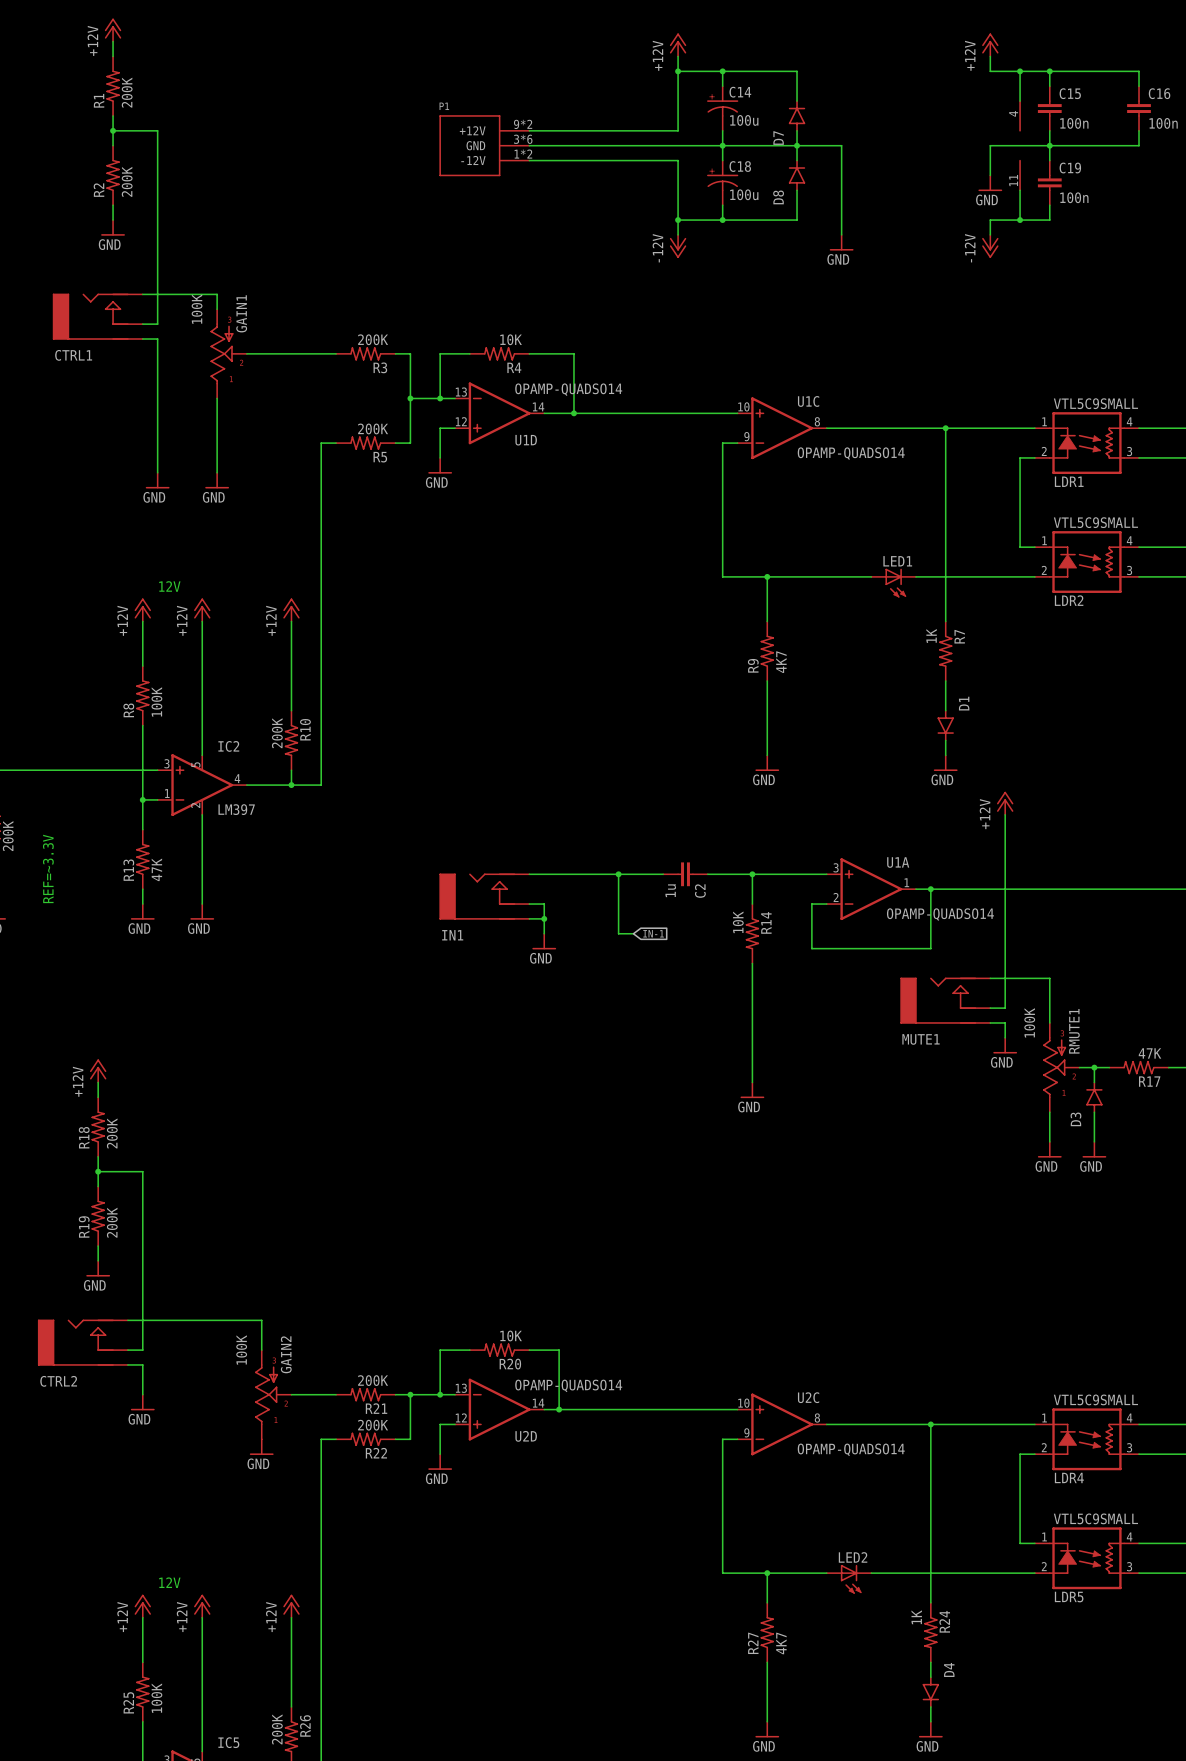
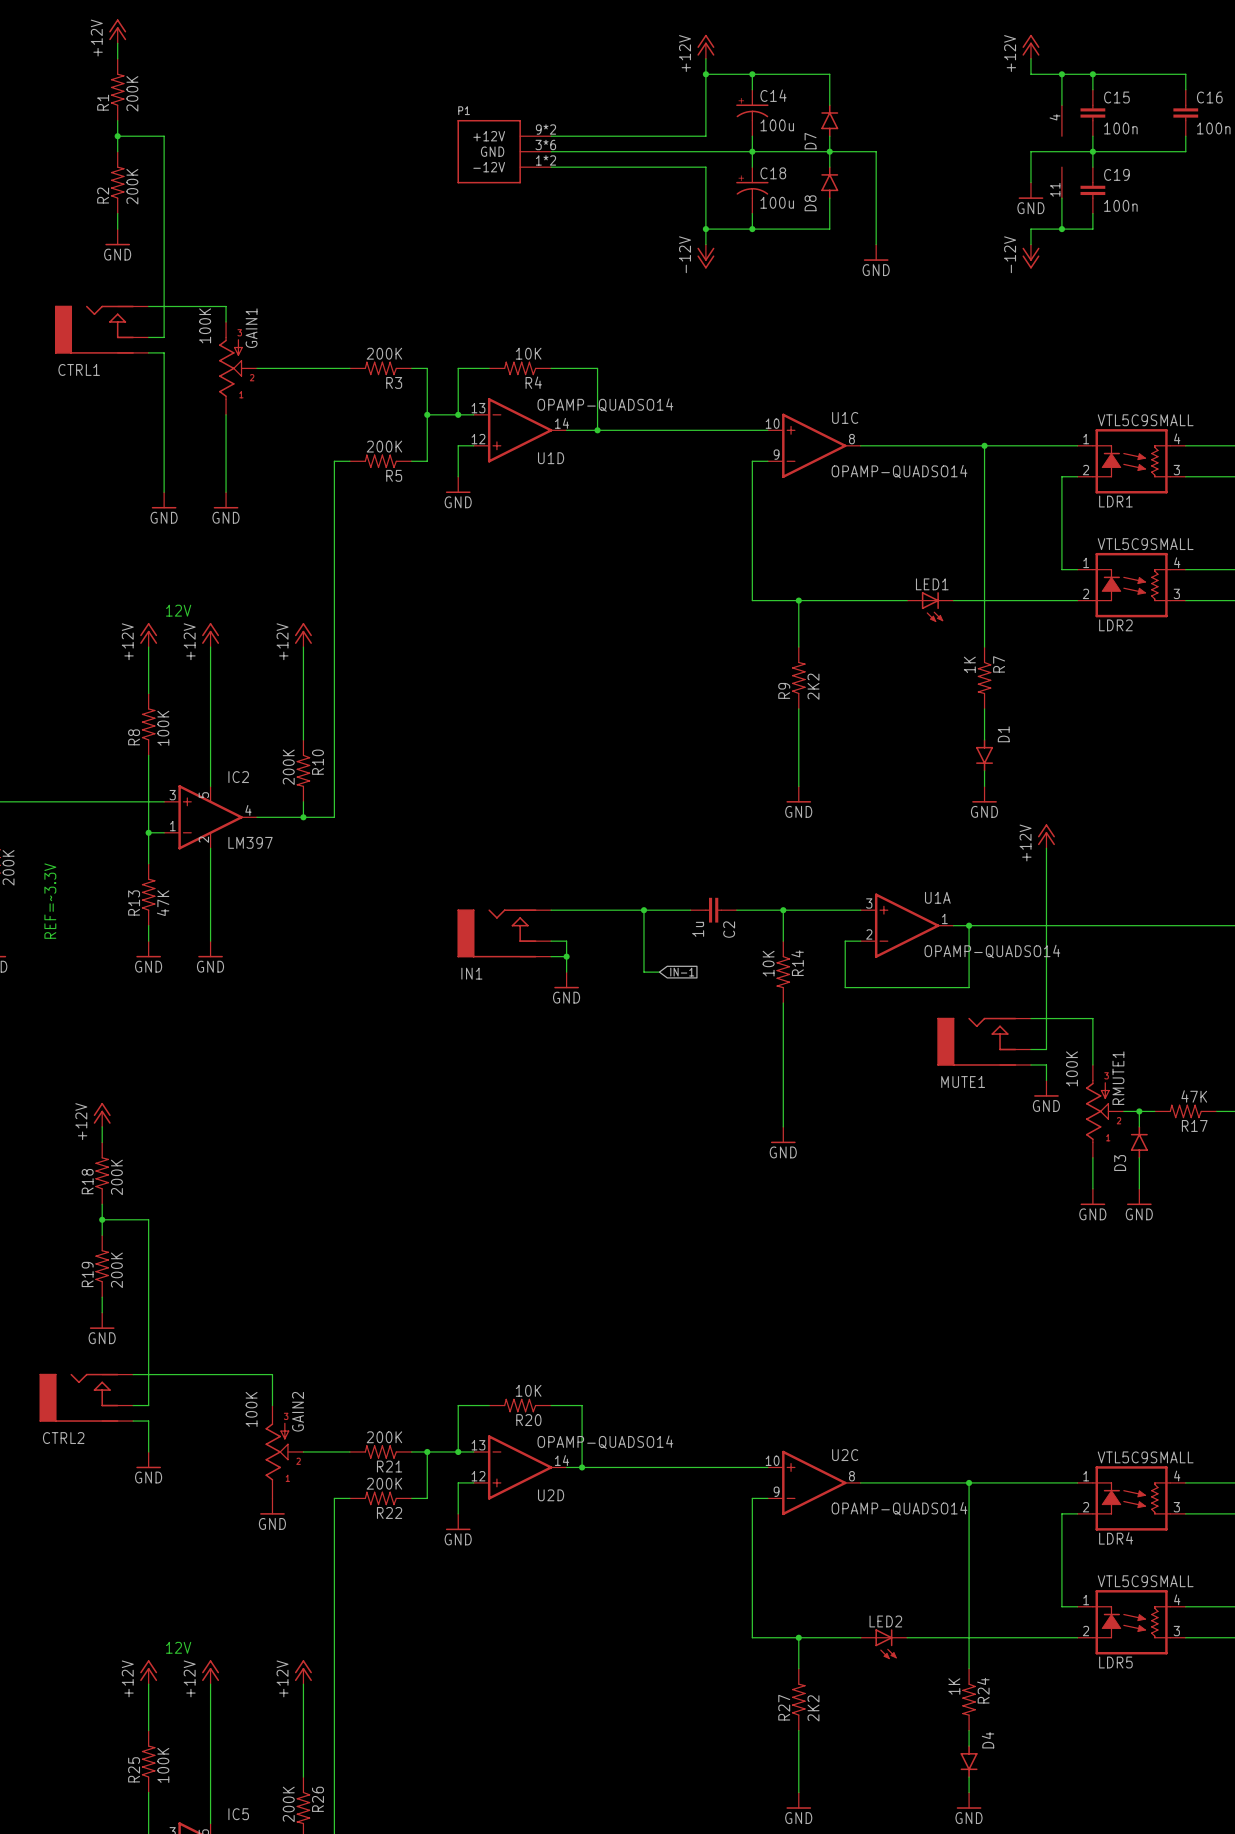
R9 value: 4K7 (781, 662) -> 2K2 (813, 686)
R27 value: 4K7 (781, 1643) -> 2K2 (813, 1708)

